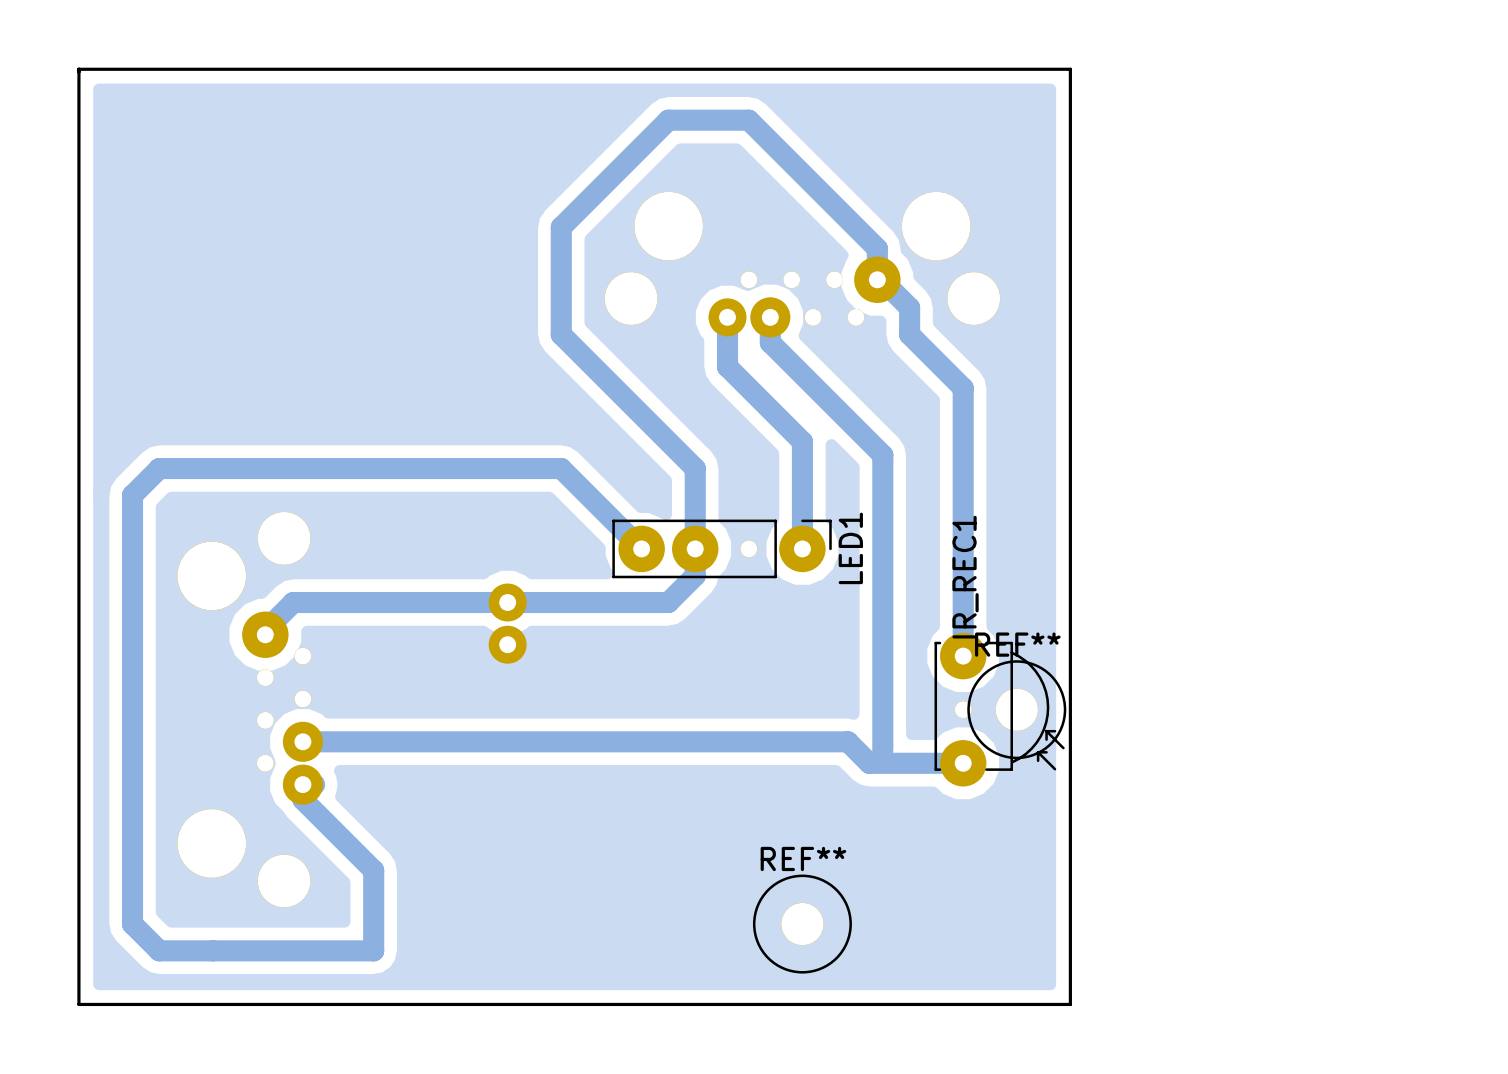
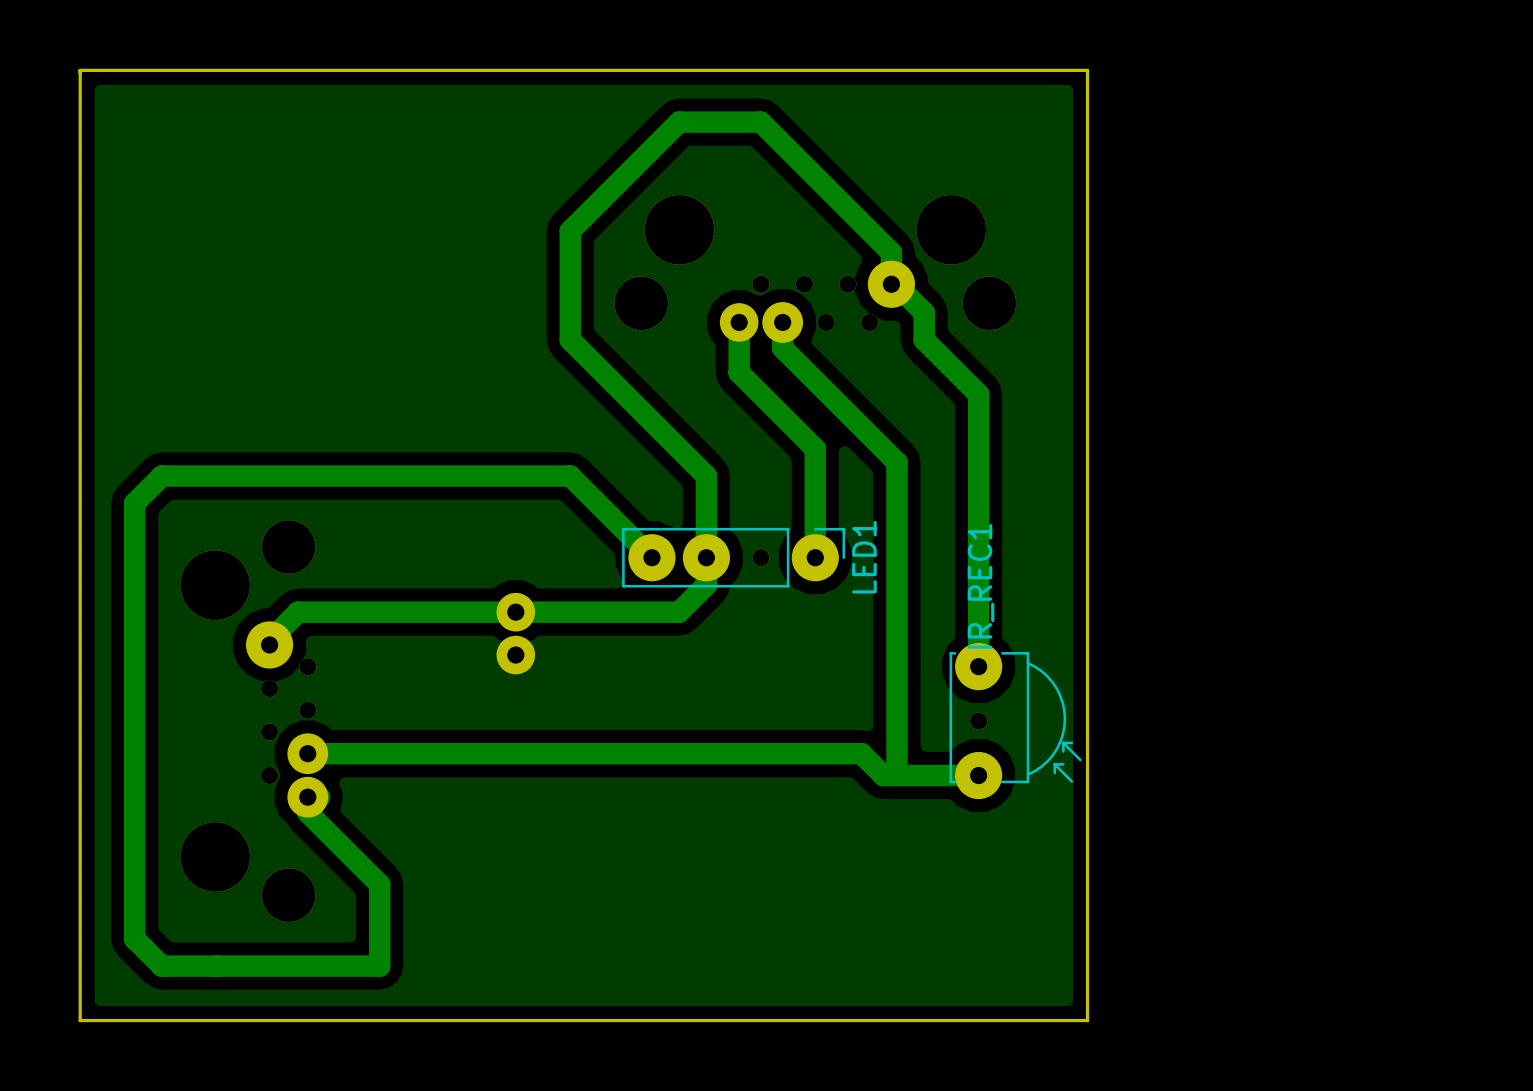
REF**: (1016, 709) -> none
REF**: (802, 924) -> none

